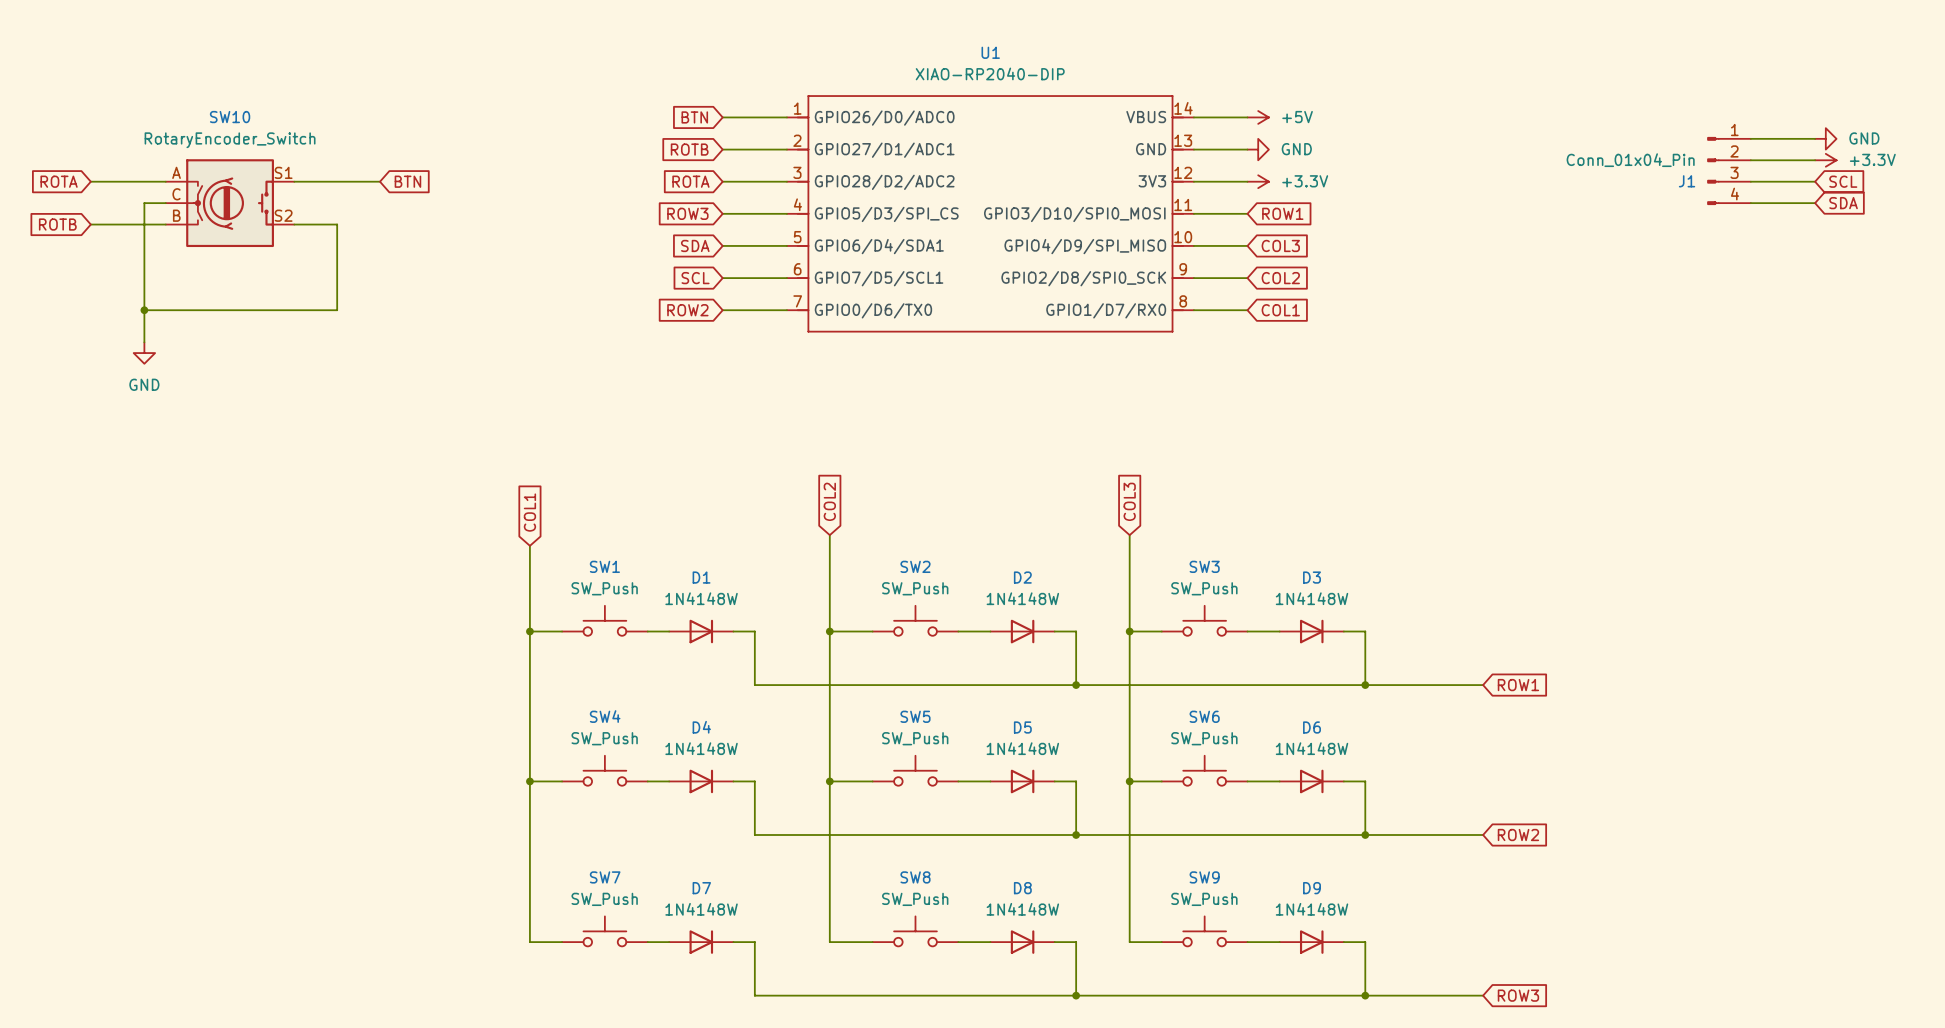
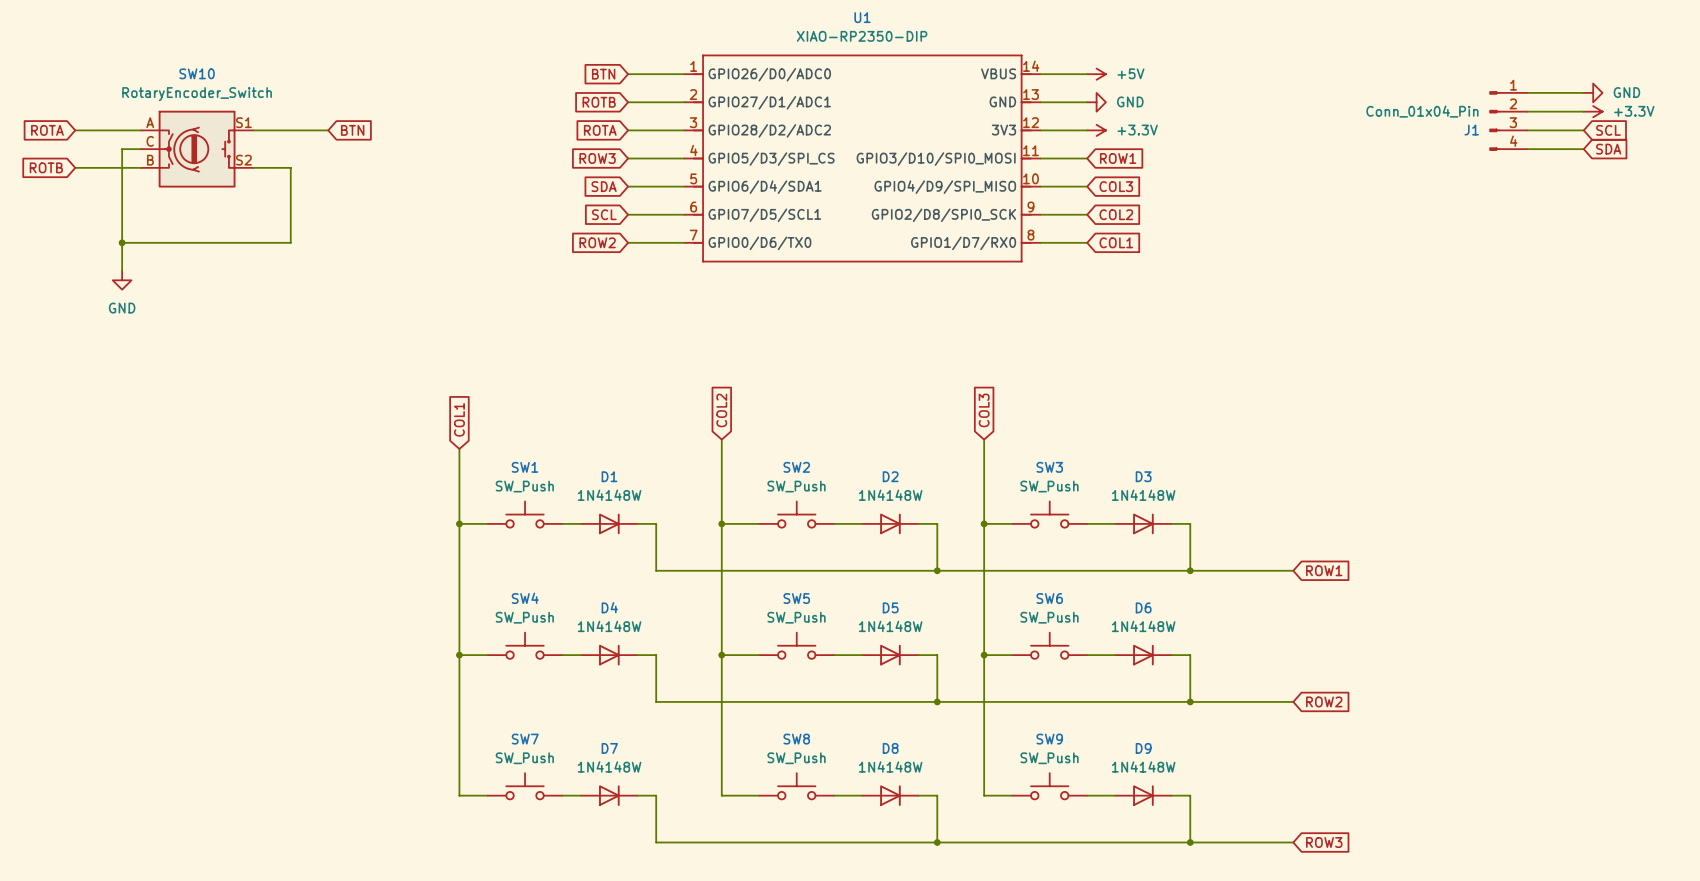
U1 value: XIAO-RP2040-DIP (990, 73) -> XIAO-RP2350-DIP (862, 36)

